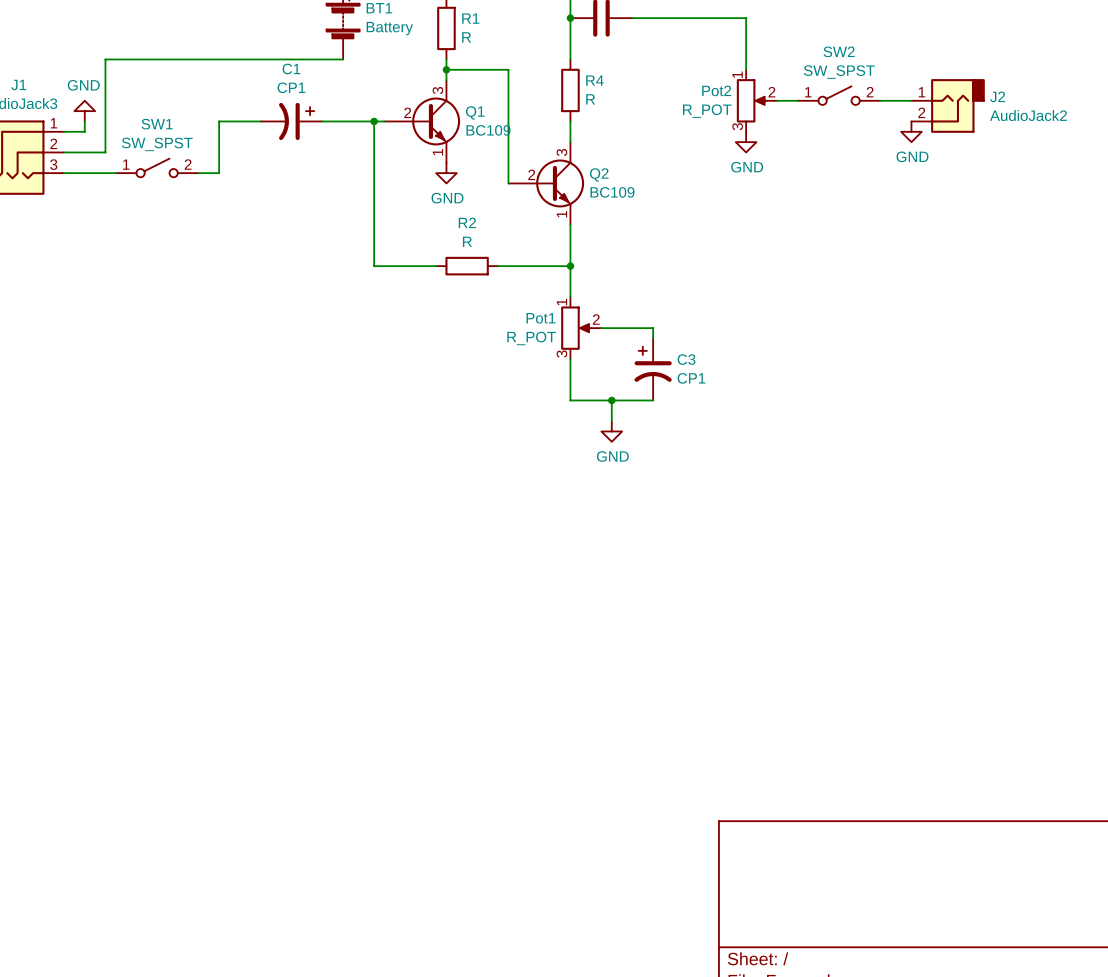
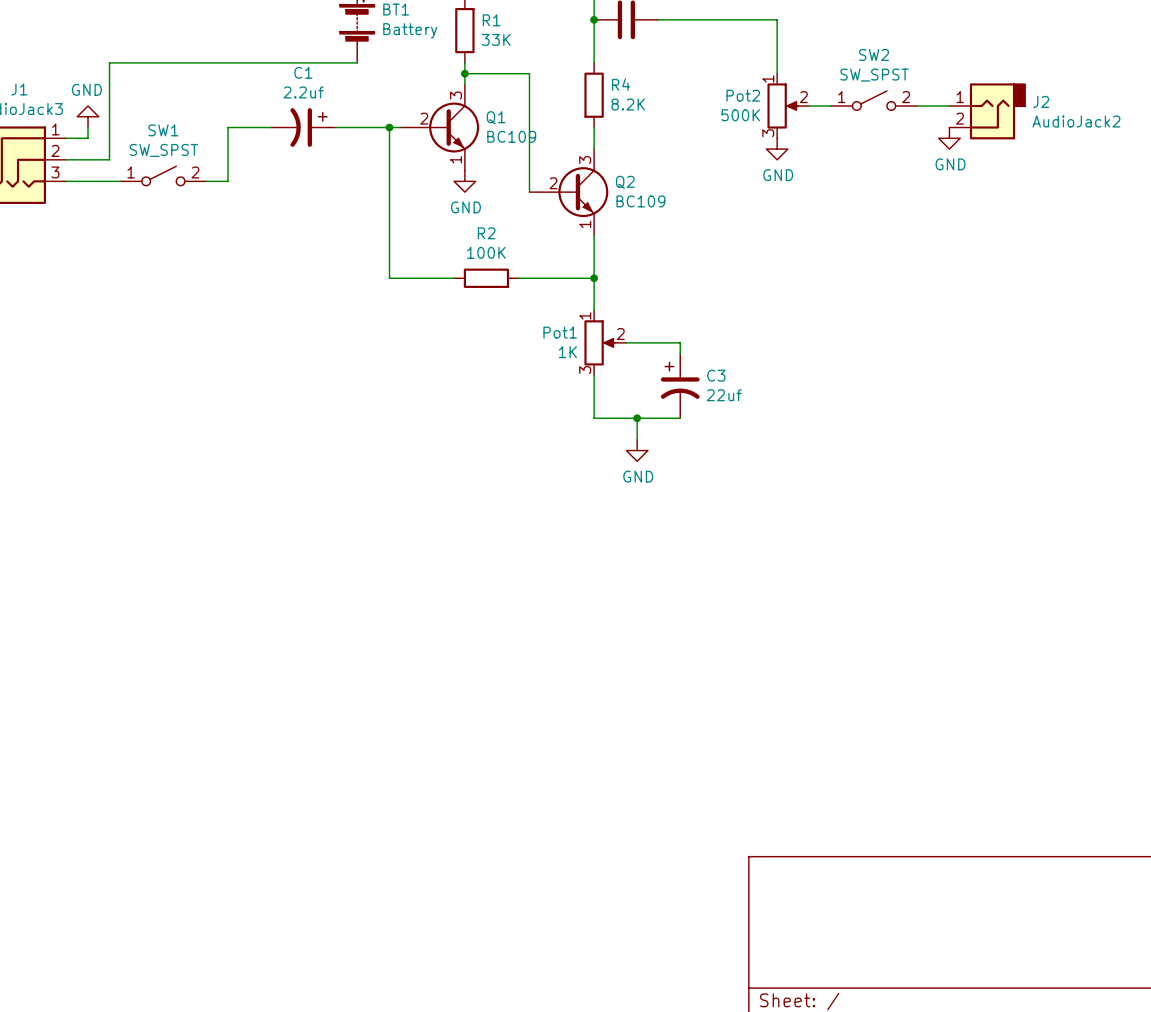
R1 value: R (466, 37) -> 33K (496, 39)
C1 value: CP1 (291, 87) -> 2.2uf (303, 92)
R4 value: R (590, 99) -> 8.2K (628, 104)
Pot2 value: R_POT (707, 111) -> 500K (740, 115)
R2 value: R (467, 241) -> 100K (486, 252)
Pot1 value: R_POT (531, 338) -> 1K (567, 352)
C3 value: CP1 (691, 378) -> 22uf (724, 395)

